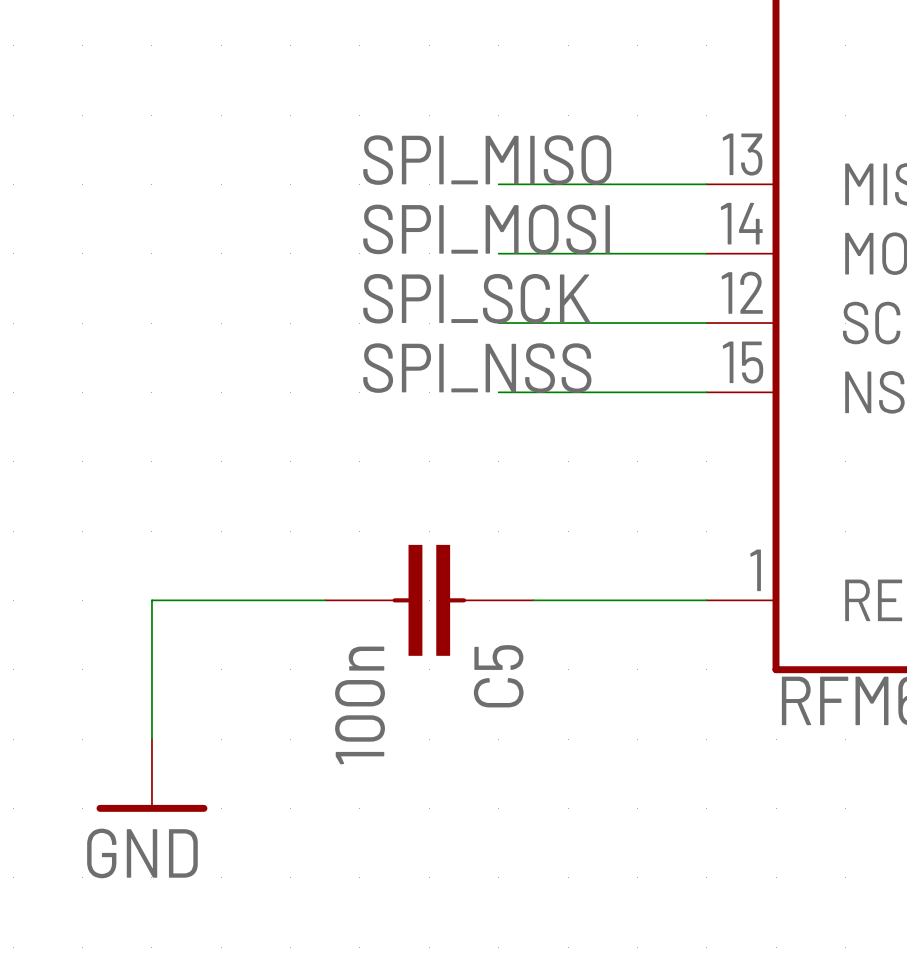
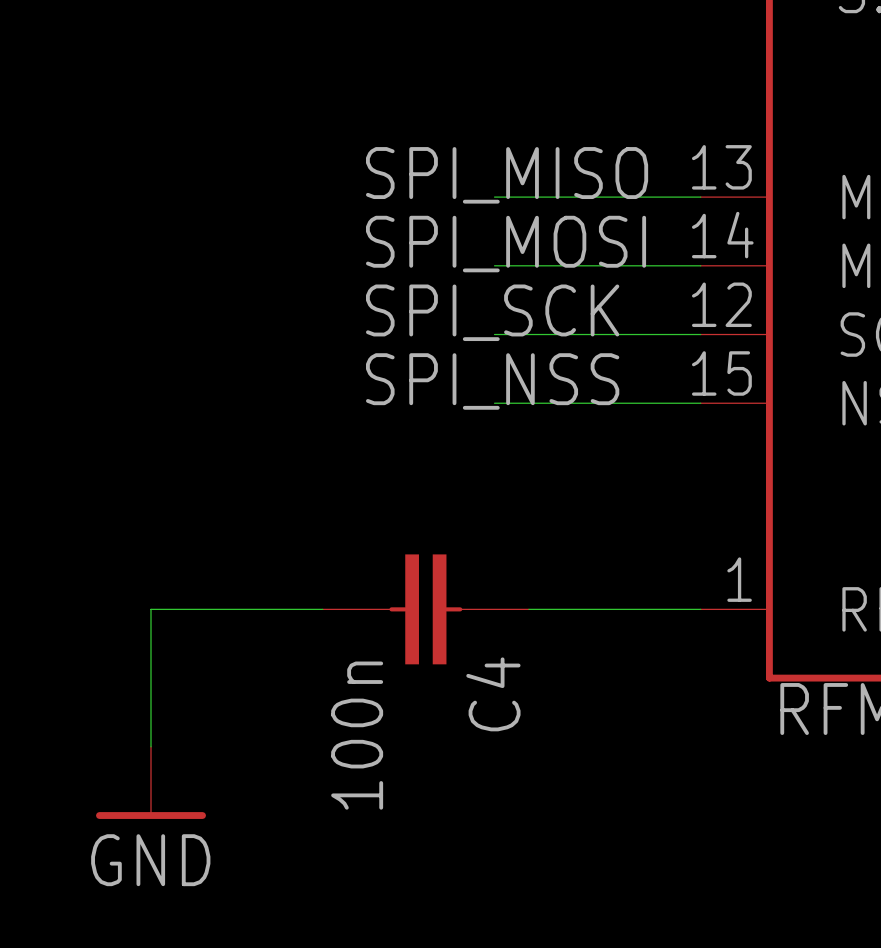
C5 name: C5 (498, 676) -> C4 (493, 694)

